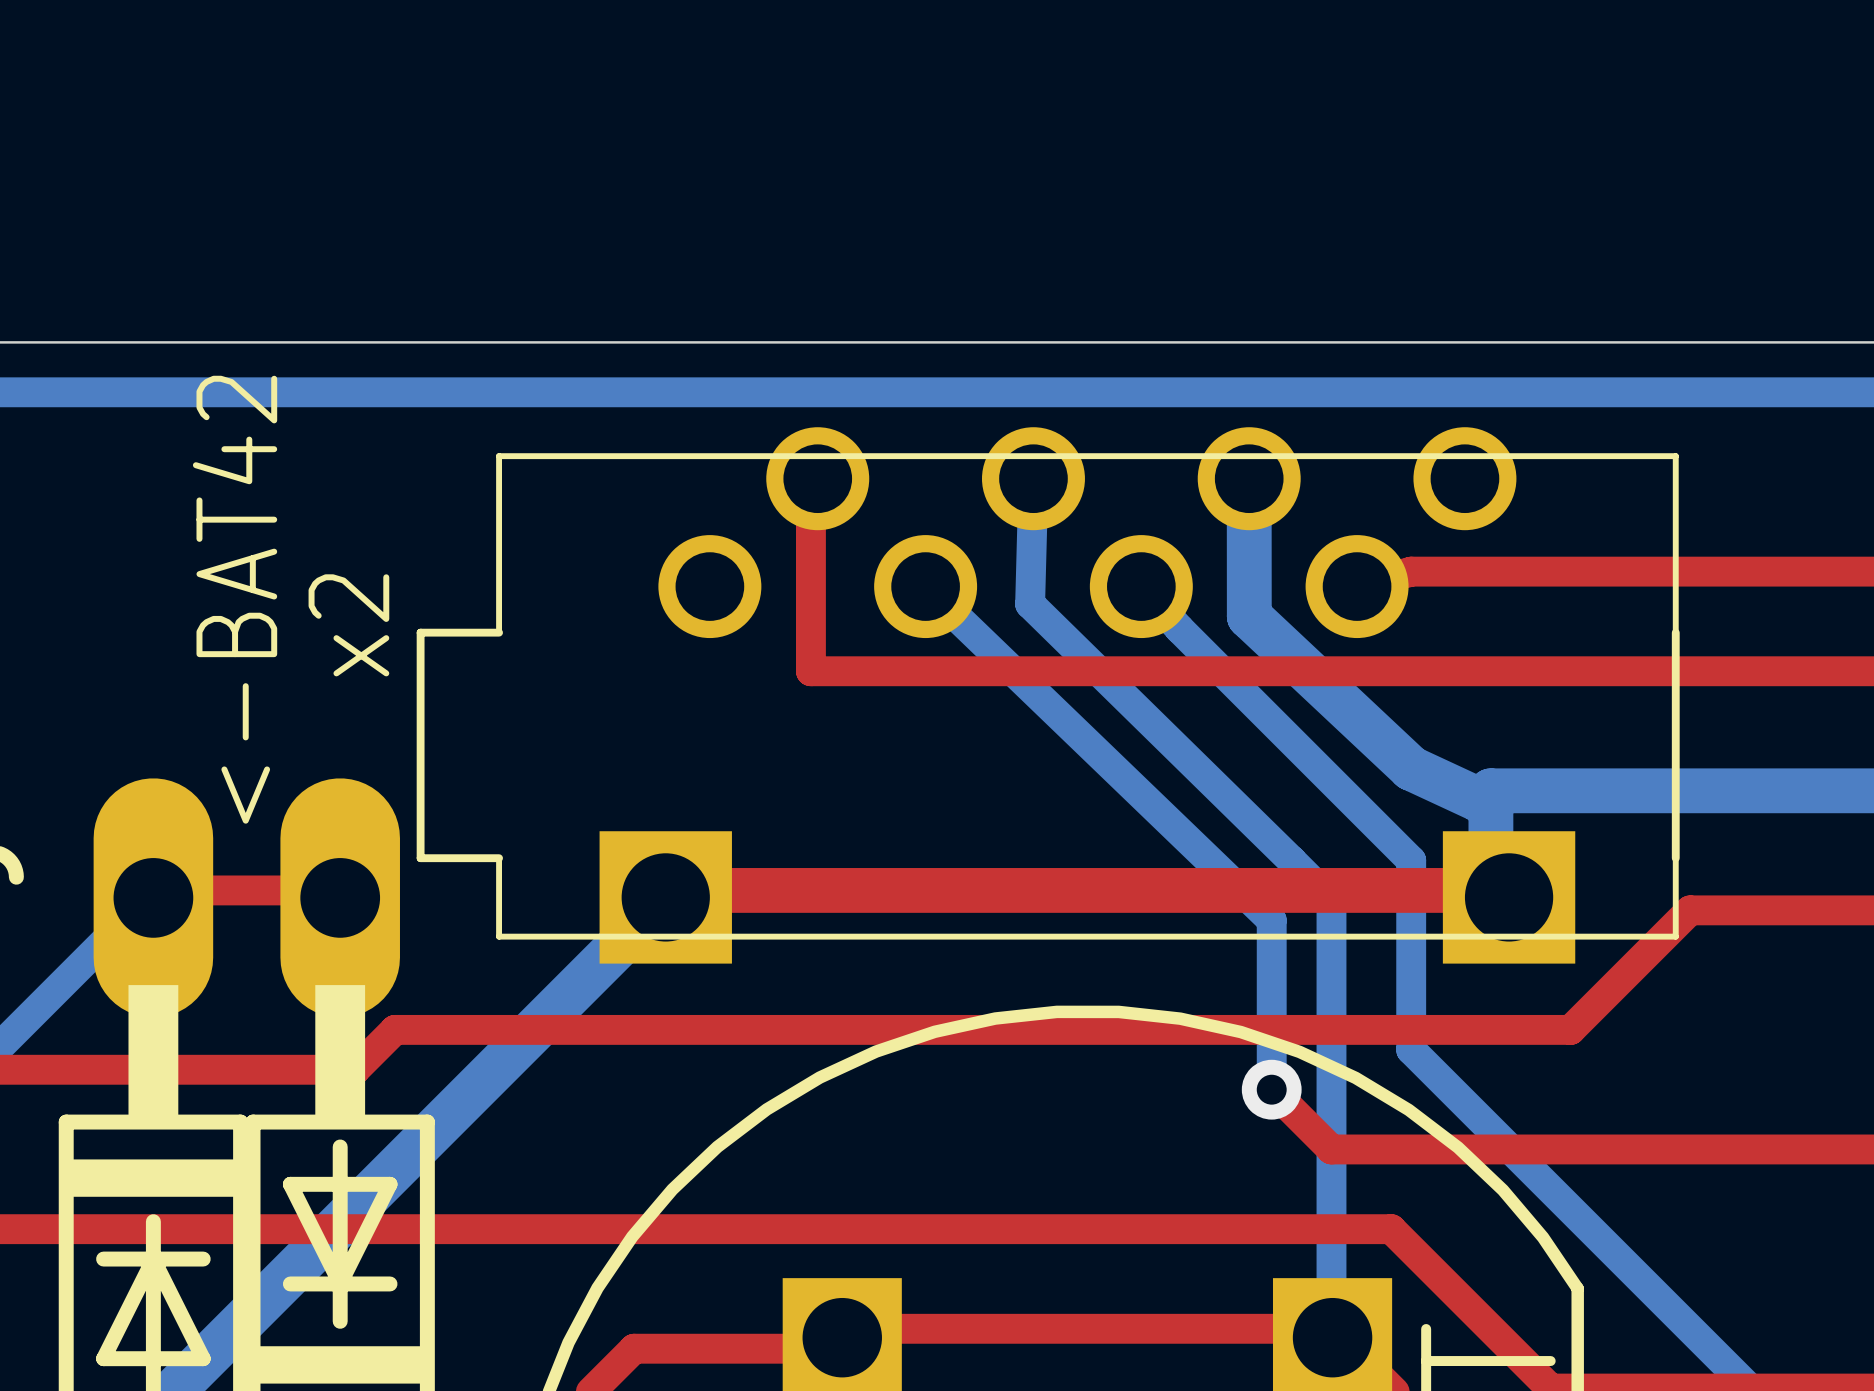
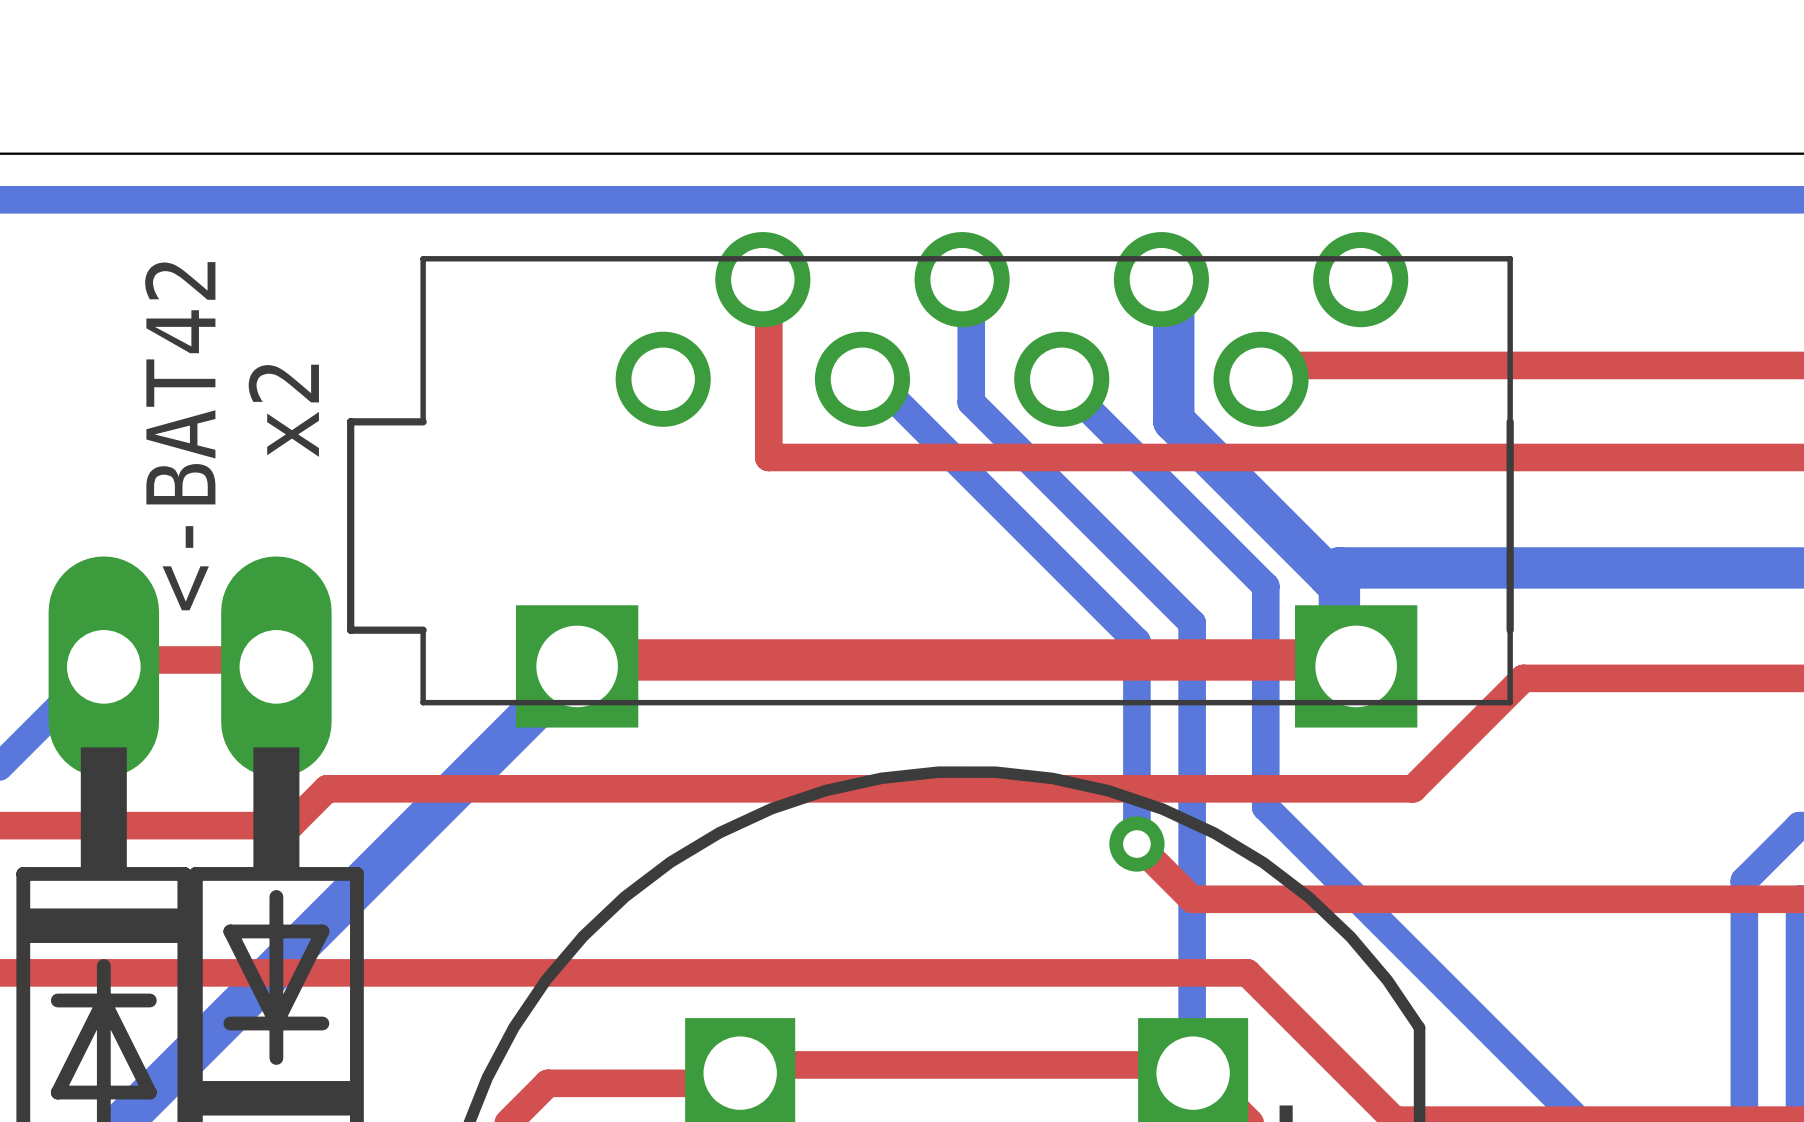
part footprint: [416, 427, 1680, 964] -> [347, 232, 1514, 728]
top track: (817, 478) (810, 491) (810, 671) (873, 671) -> (762, 279) (768, 291) (768, 457)
bottom track: (1033, 478) (1030, 604) (1331, 900) -> (962, 279) (971, 291) (971, 402) (1192, 623) (1192, 669)
bottom track: (1249, 478) (1249, 616) (1411, 768) (1480, 800) -> (1161, 279) (1173, 291) (1173, 420) (1330, 577)
bottom track: (925, 586) (1271, 920) -> (862, 379) (879, 383) (1136, 641) (1136, 687)
bottom track: (1141, 586) (1179, 628) (1411, 860) -> (1061, 379) (1063, 383) (1265, 586) (1265, 632)

